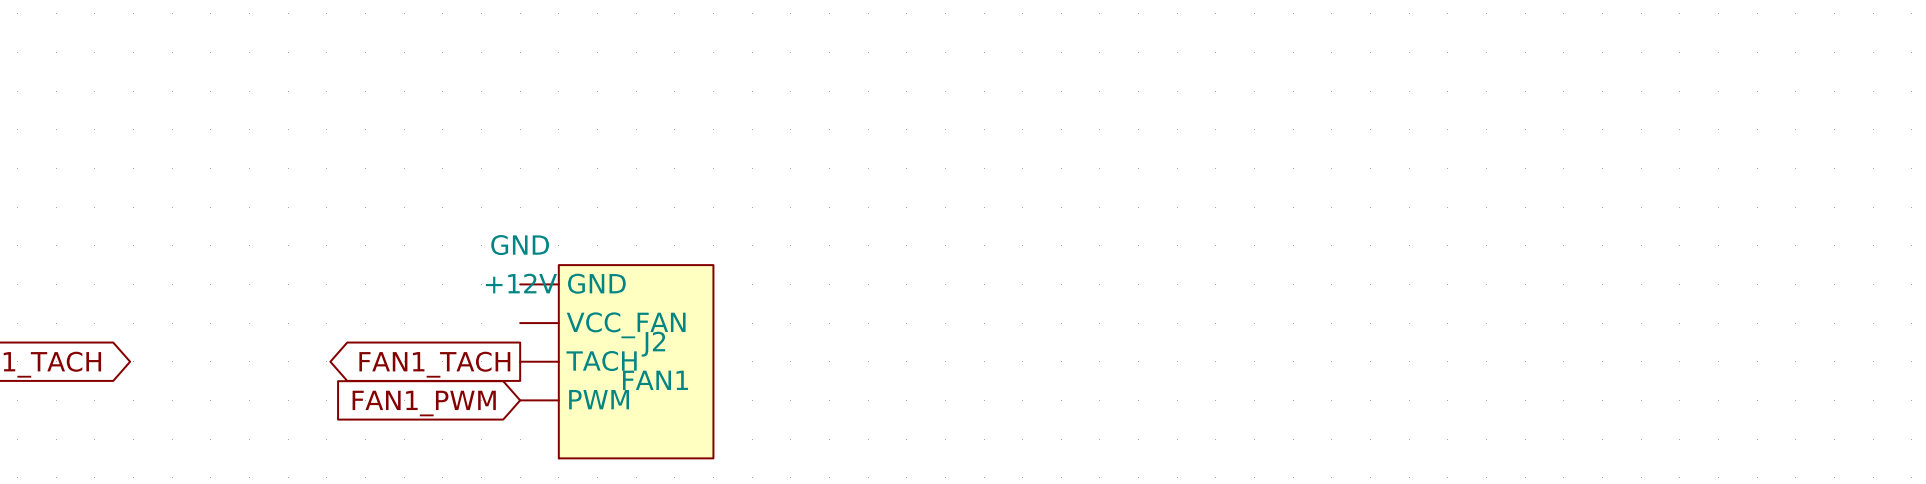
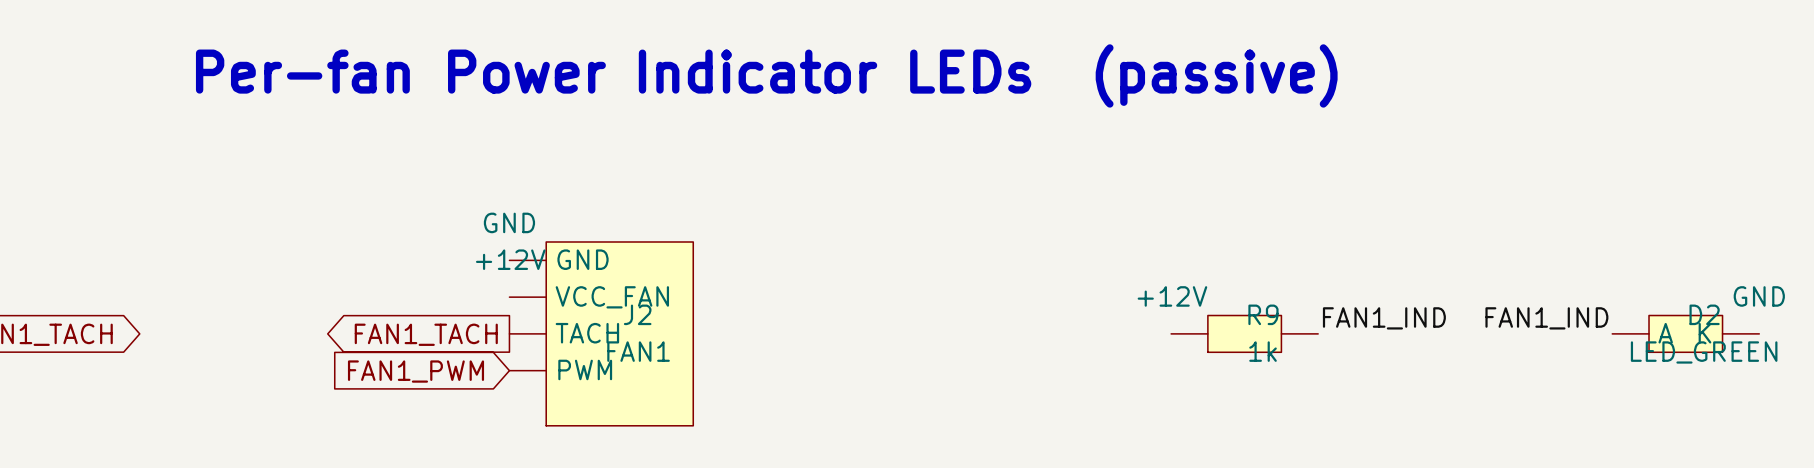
text: none -> Per-fan Power Indicator LEDs (passive) (766, 75)
power symbol: none -> +12V (1172, 296)
power symbol: none -> GND (1759, 296)
label: none -> FAN1_IND (1384, 318)
label: none -> FAN1_IND (1546, 318)
R9: none -> 1k (1244, 333)
D2: none -> LED_GREEN (1685, 333)

